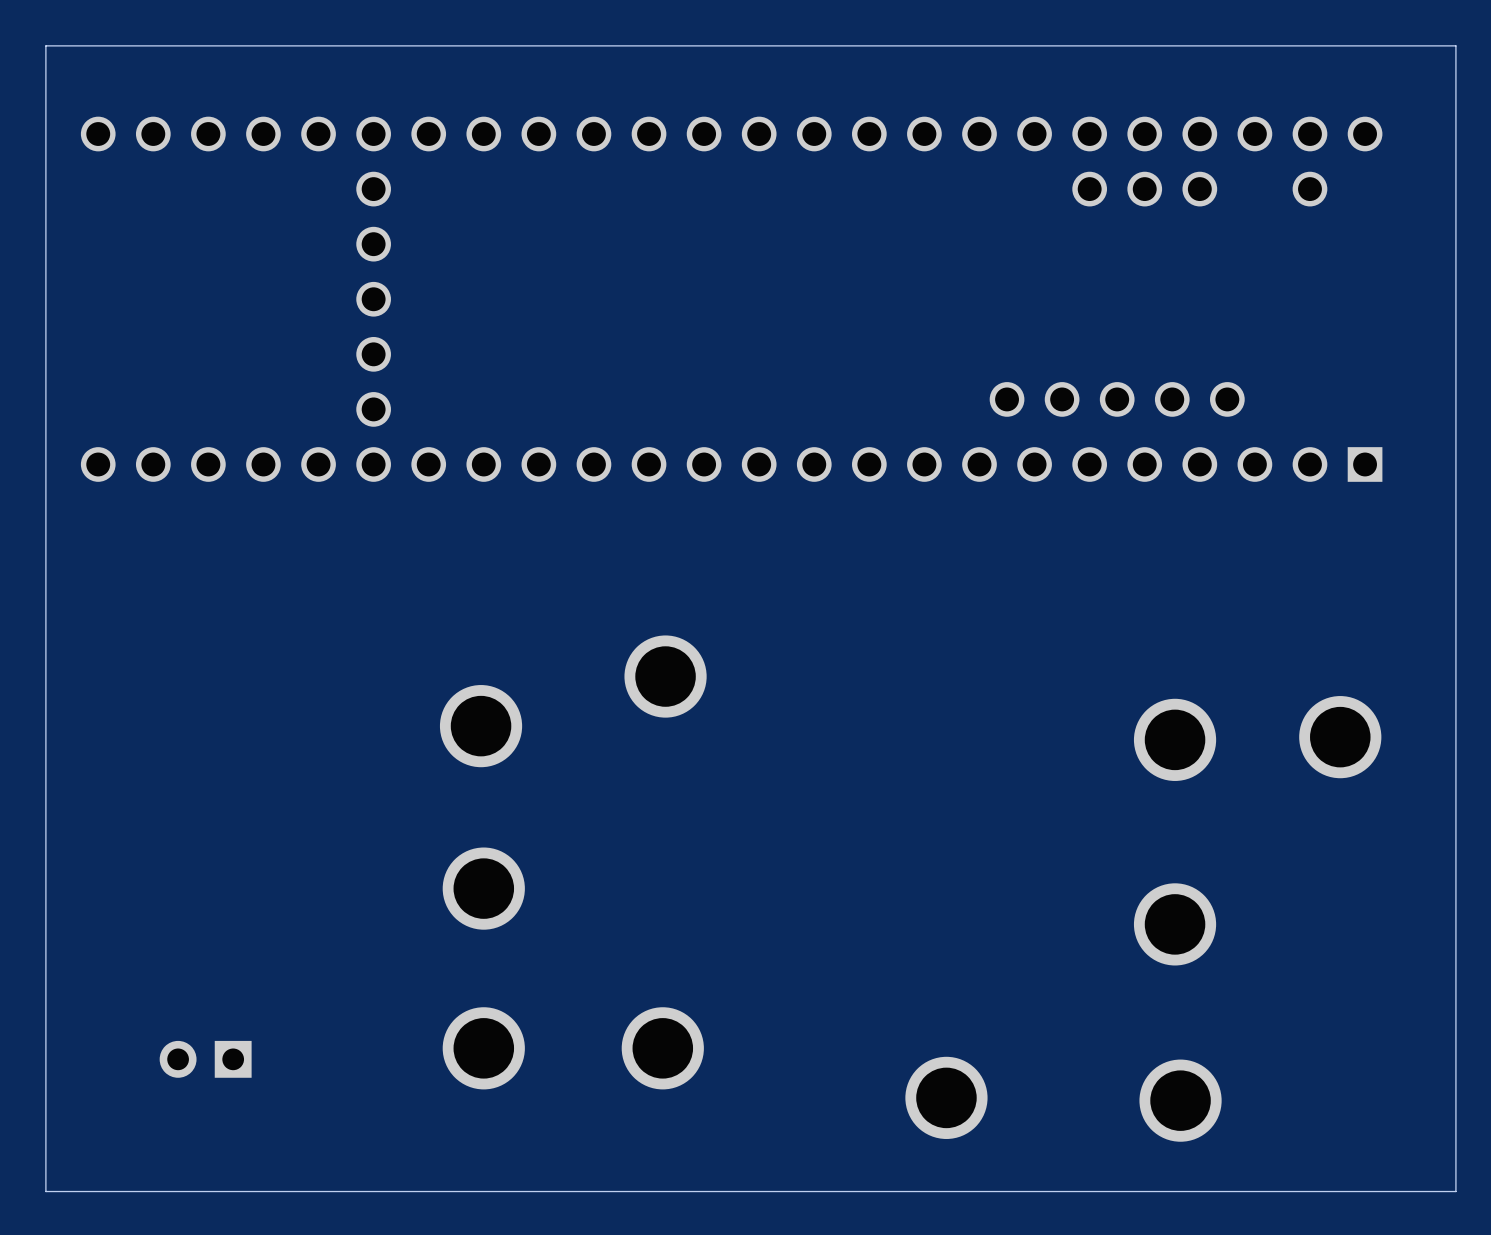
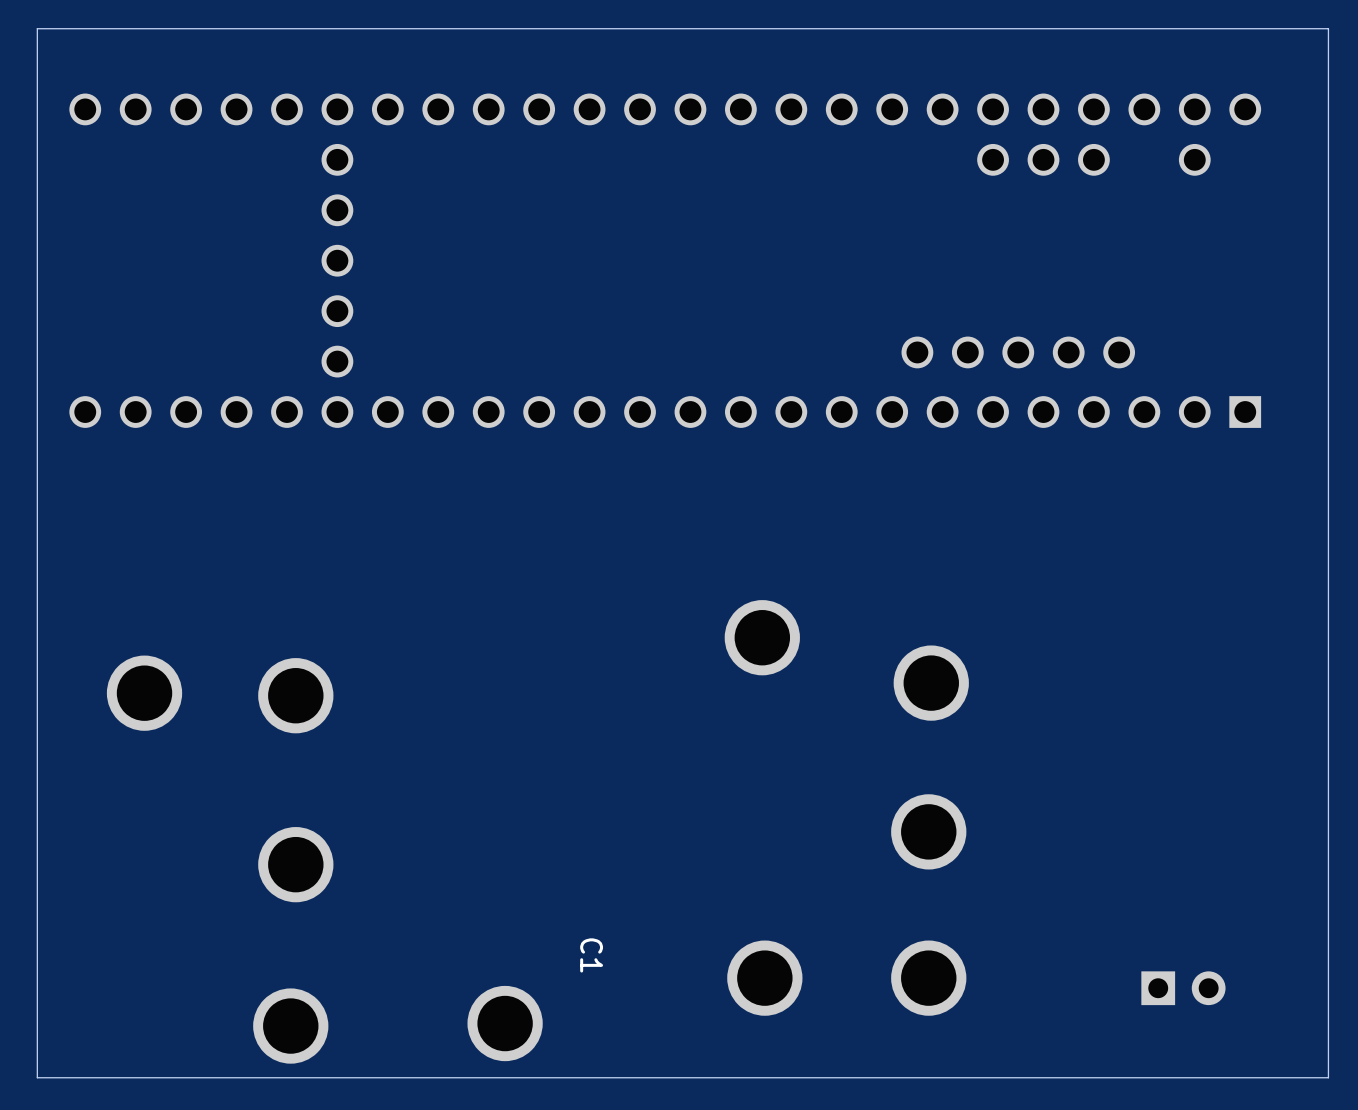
part: (665, 676) -> none
part: none -> (762, 637)
part: (481, 726) -> none
part: (1340, 737) -> none
part: (1175, 739) -> none
part: none -> (931, 683)
part: none -> (144, 693)
part: none -> (295, 695)
part: (483, 888) -> none
part: none -> (928, 831)
part: (1175, 924) -> none
part: none -> (295, 864)
part: (483, 1048) -> none
part: (662, 1048) -> none
C1: none -> (591, 955)
part: (205, 1059) -> none
part: none -> (764, 978)
part: none -> (928, 978)
part: none -> (1183, 988)
part: (946, 1097) -> none
part: (1180, 1100) -> none
part: none -> (505, 1023)
part: none -> (290, 1026)

